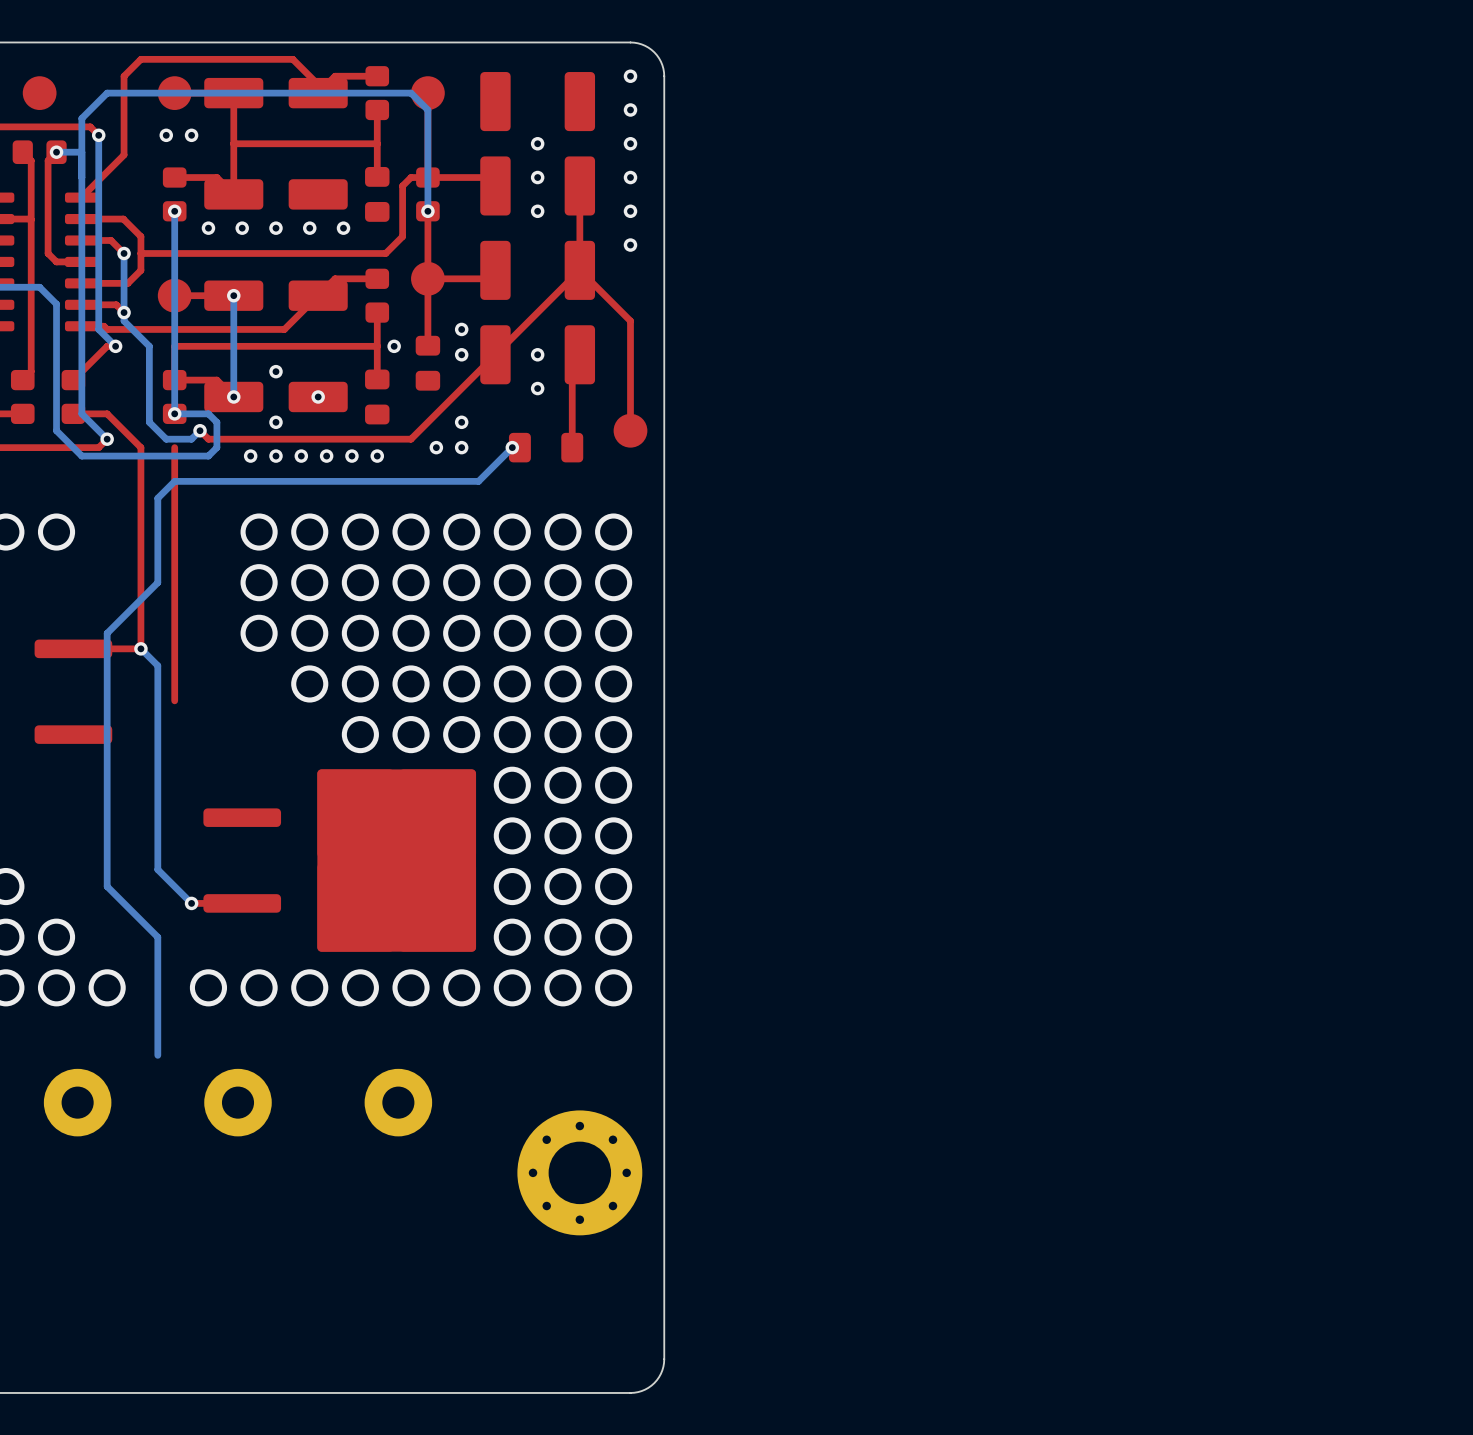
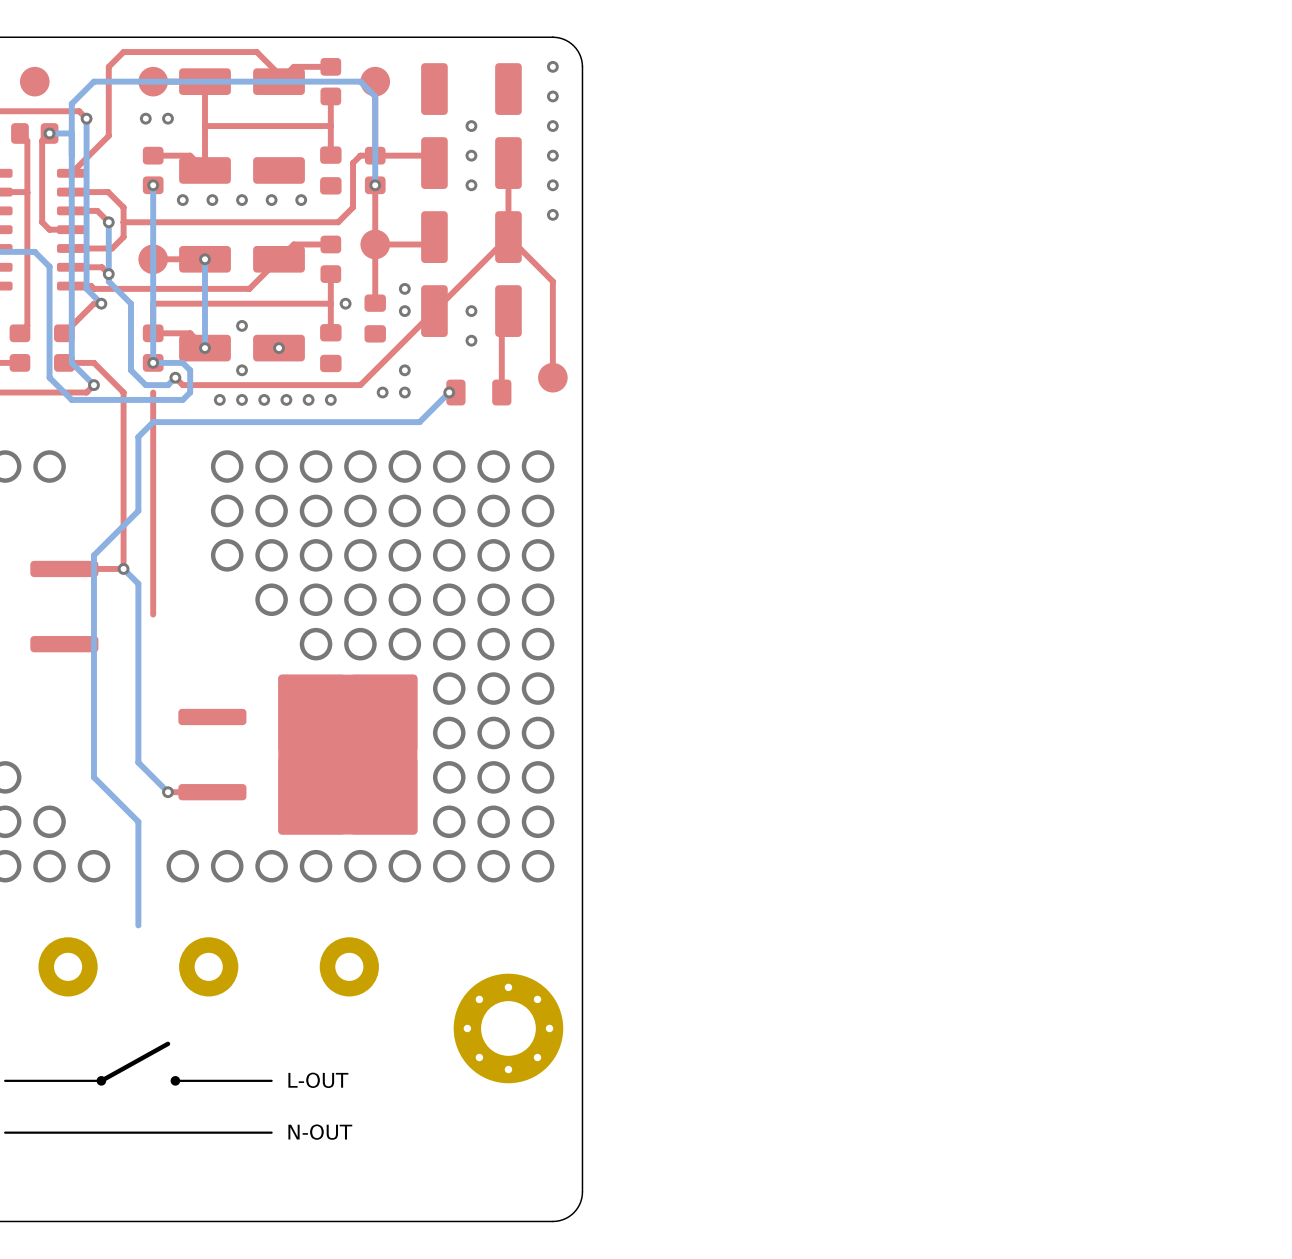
line: none -> (167, 1043) (101, 1080) (5, 1080)
drawing: none -> [96, 1076, 107, 1086]
drawing: none -> [170, 1076, 181, 1086]
text: none -> L-OUT (318, 1080)
line: none -> (271, 1080) (175, 1080)
line: none -> (271, 1132) (5, 1132)
text: none -> N-OUT (320, 1132)

